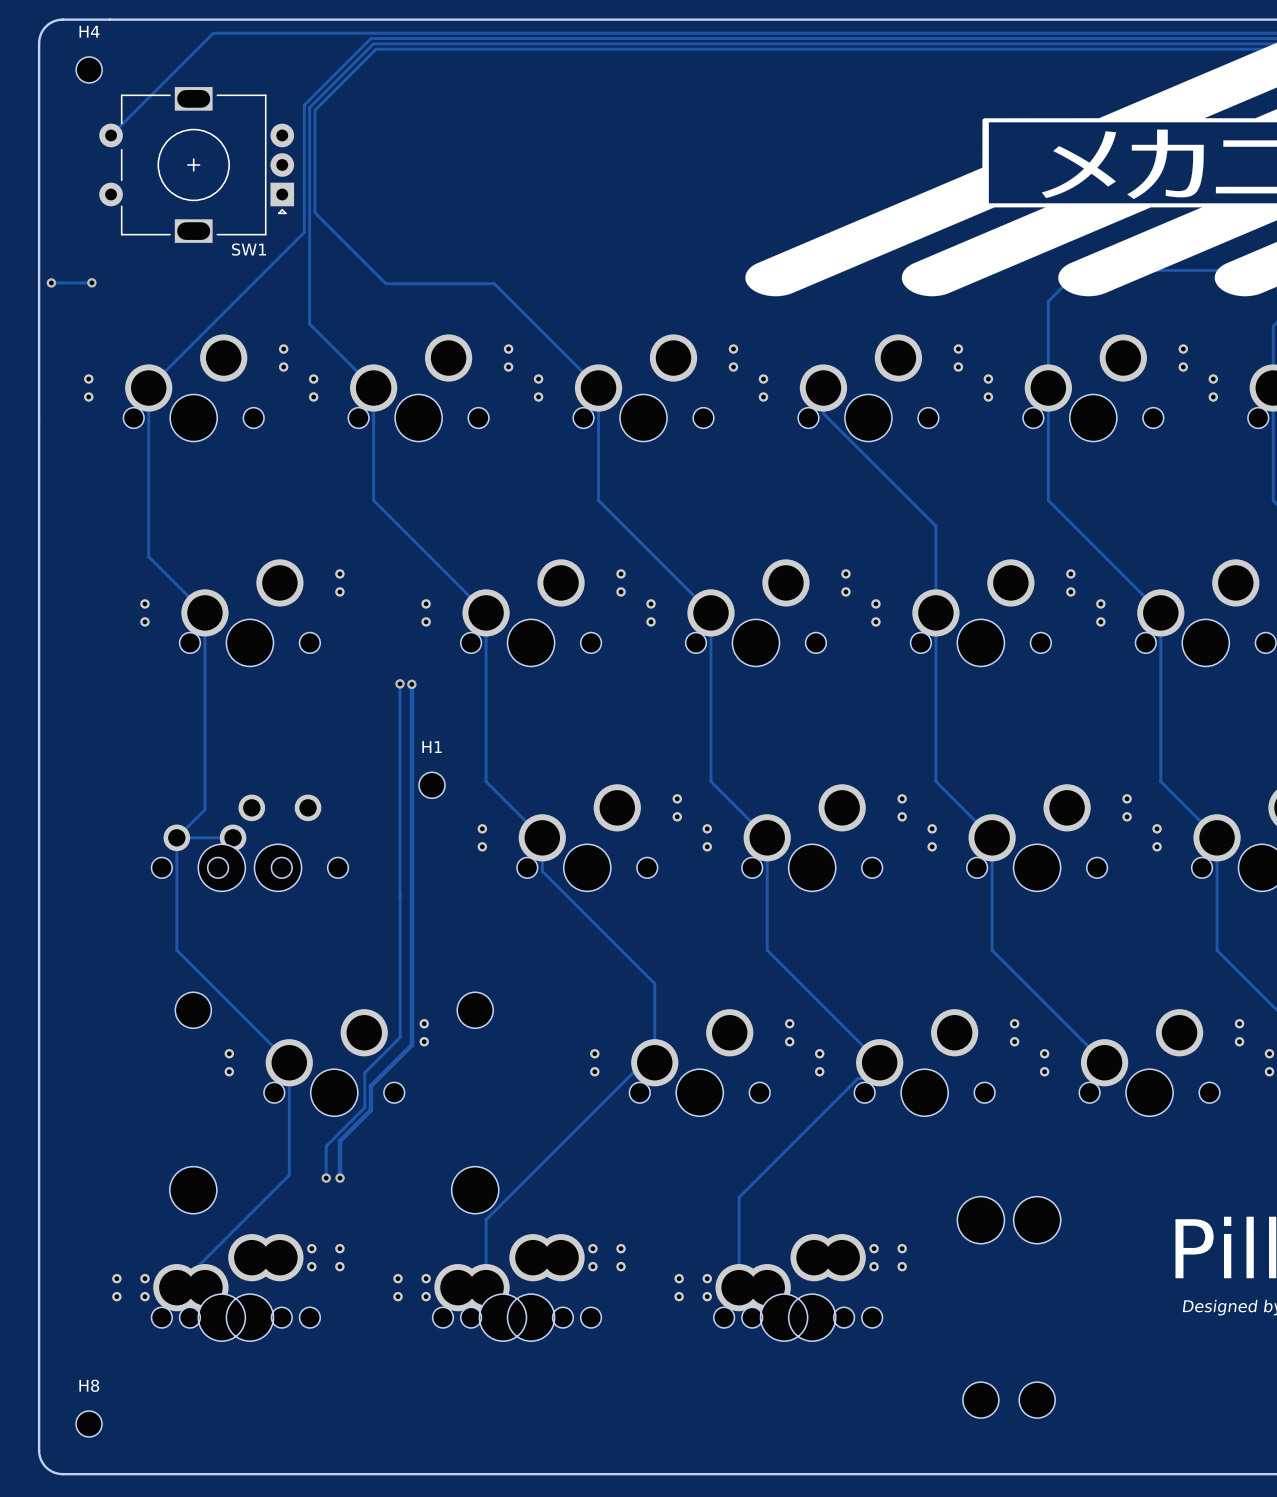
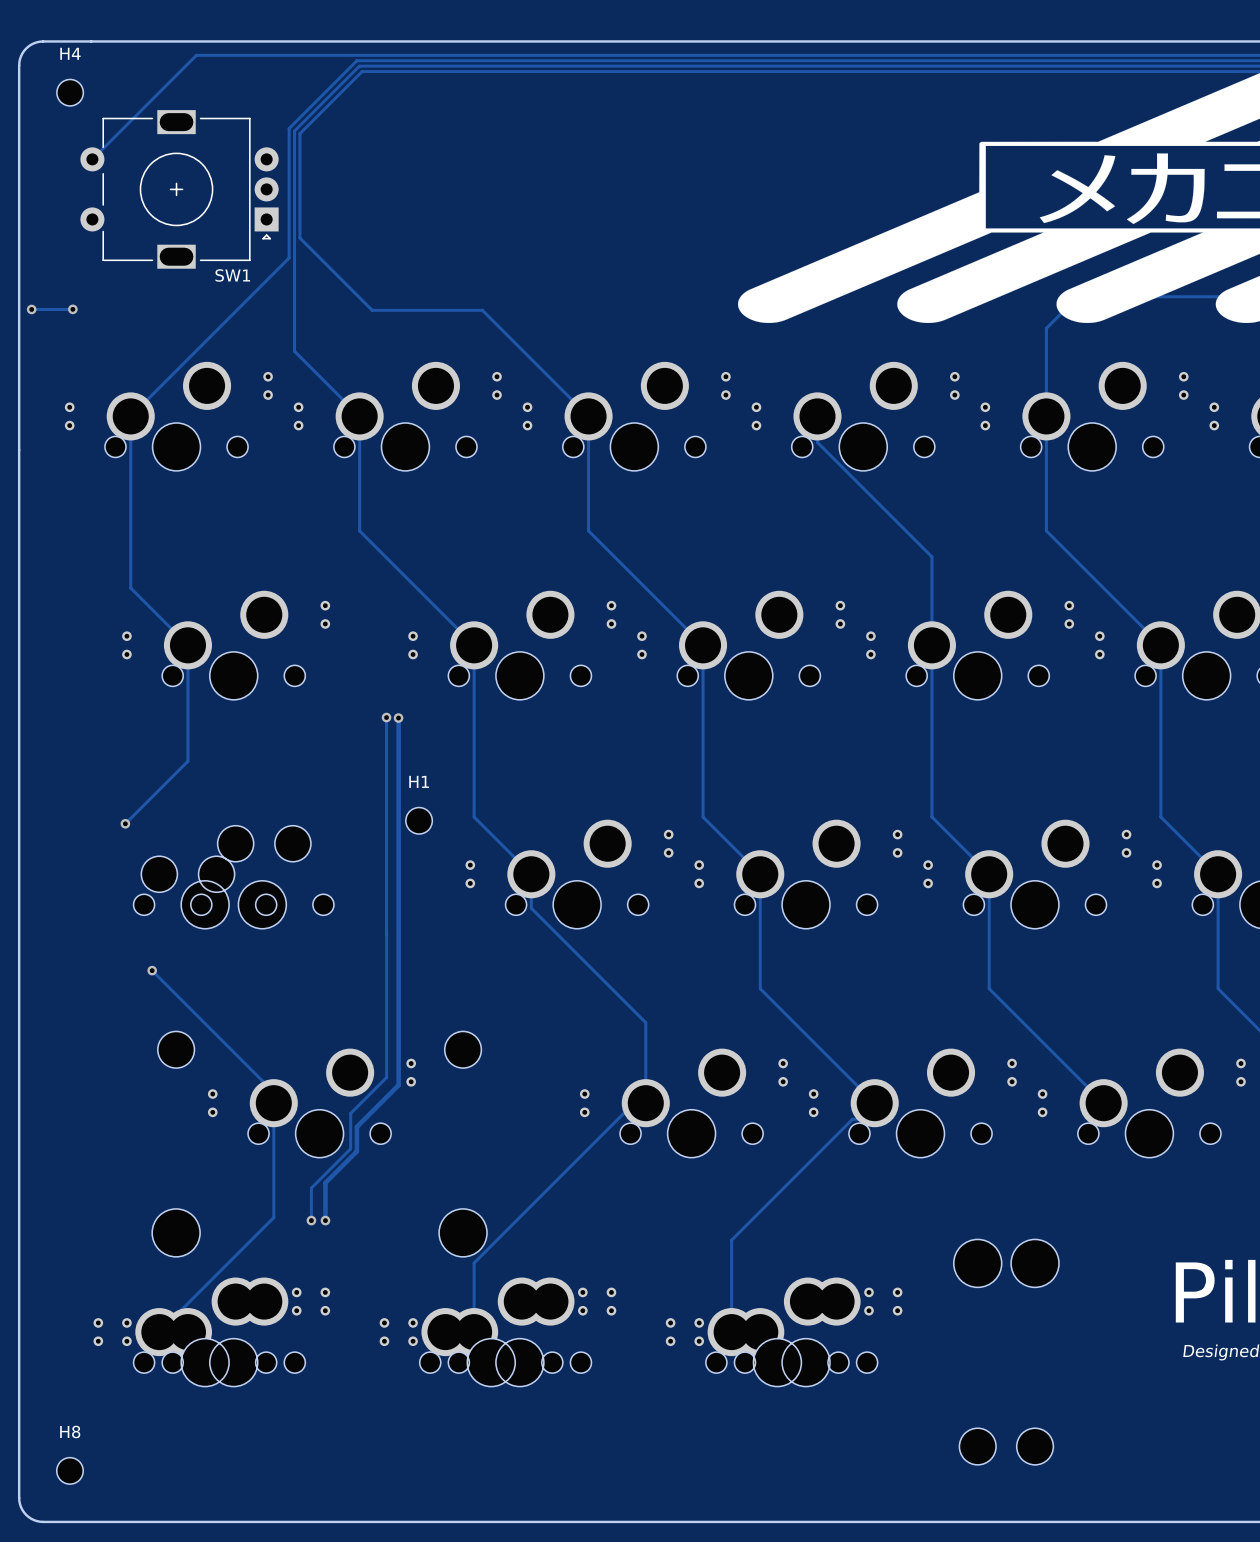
track: (204, 726) (204, 809) (176, 837) -> (187, 761) (125, 823)
via: none -> (125, 823)
part footprint: [151, 794, 293, 892] -> [133, 825, 277, 929]
part footprint: [207, 794, 349, 892] -> [190, 825, 334, 929]
track: (176, 837) (176, 950) (289, 1062) -> (152, 970) (273, 1092) (273, 1103)
track: (176, 837) (233, 837) -> none
via: none -> (152, 970)

